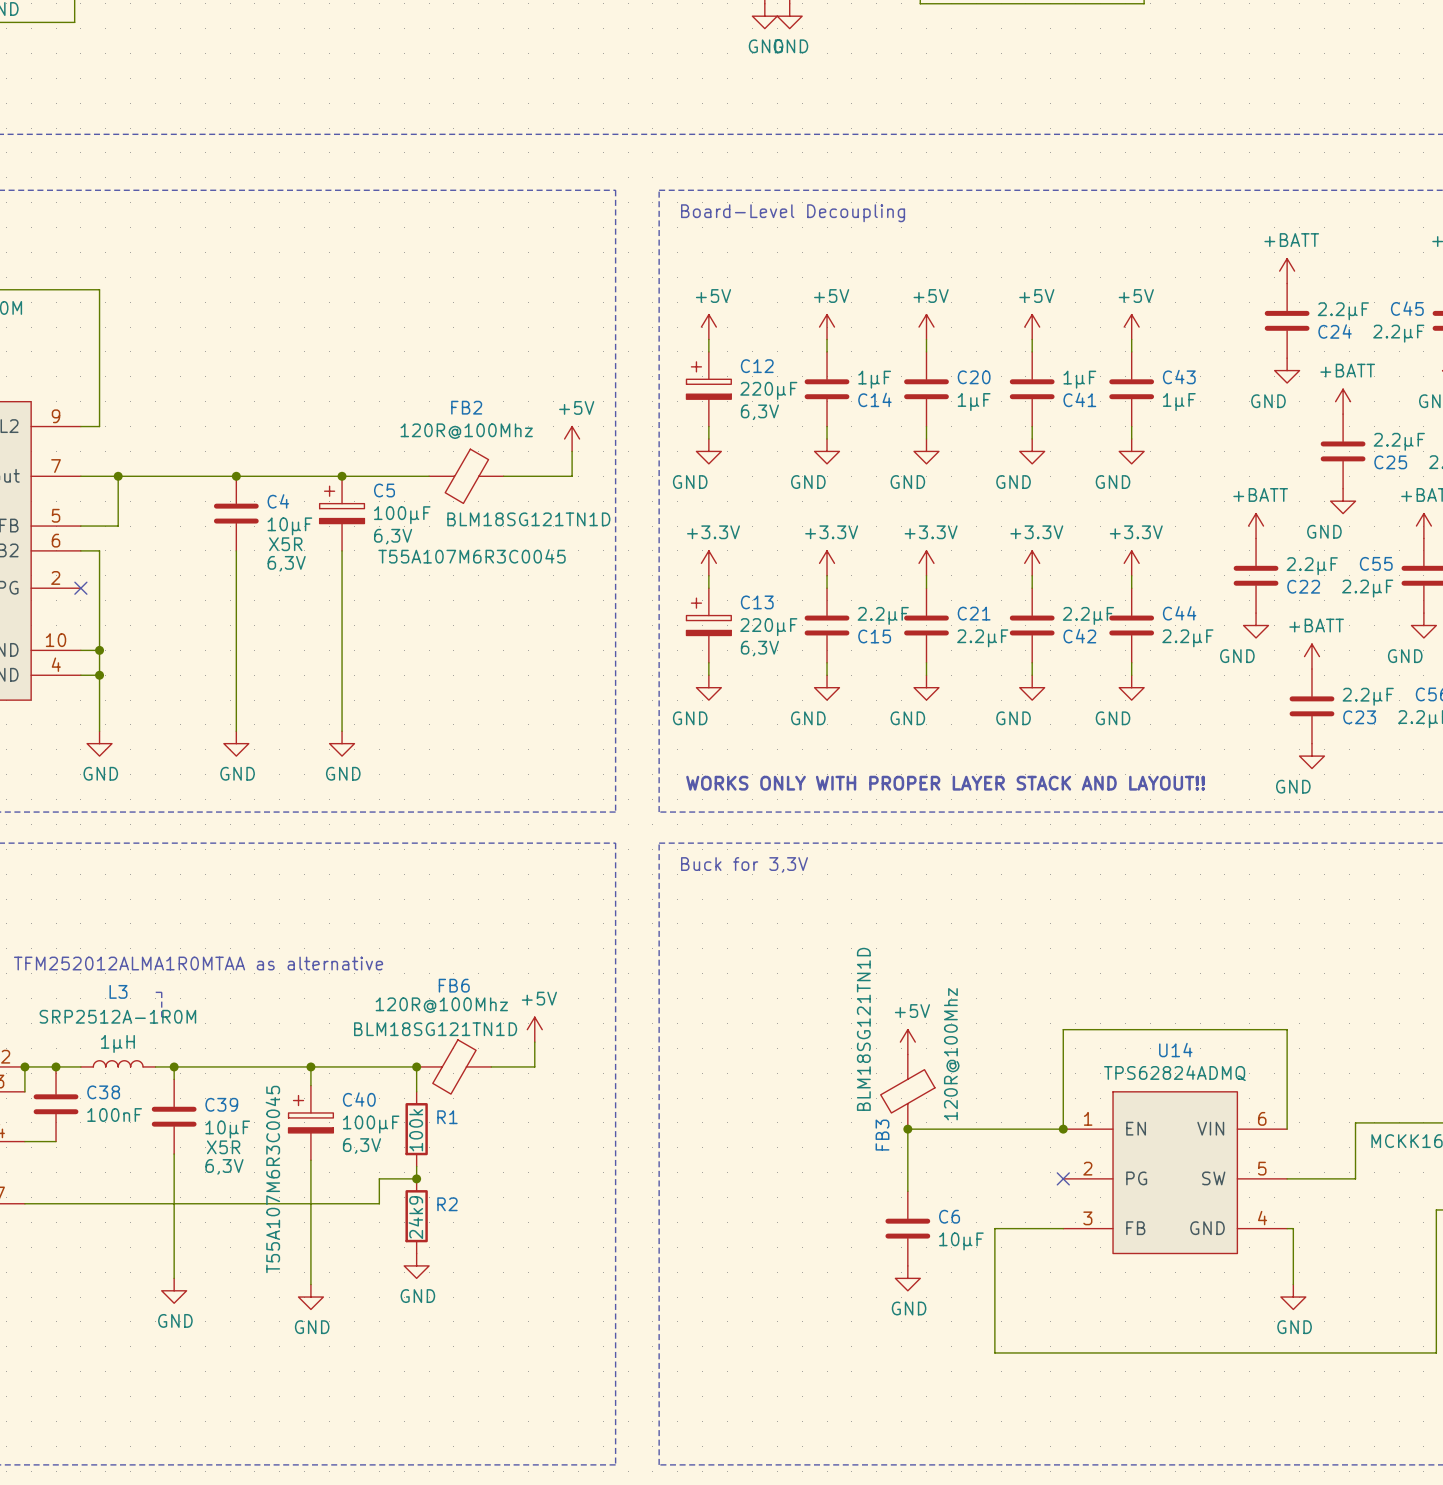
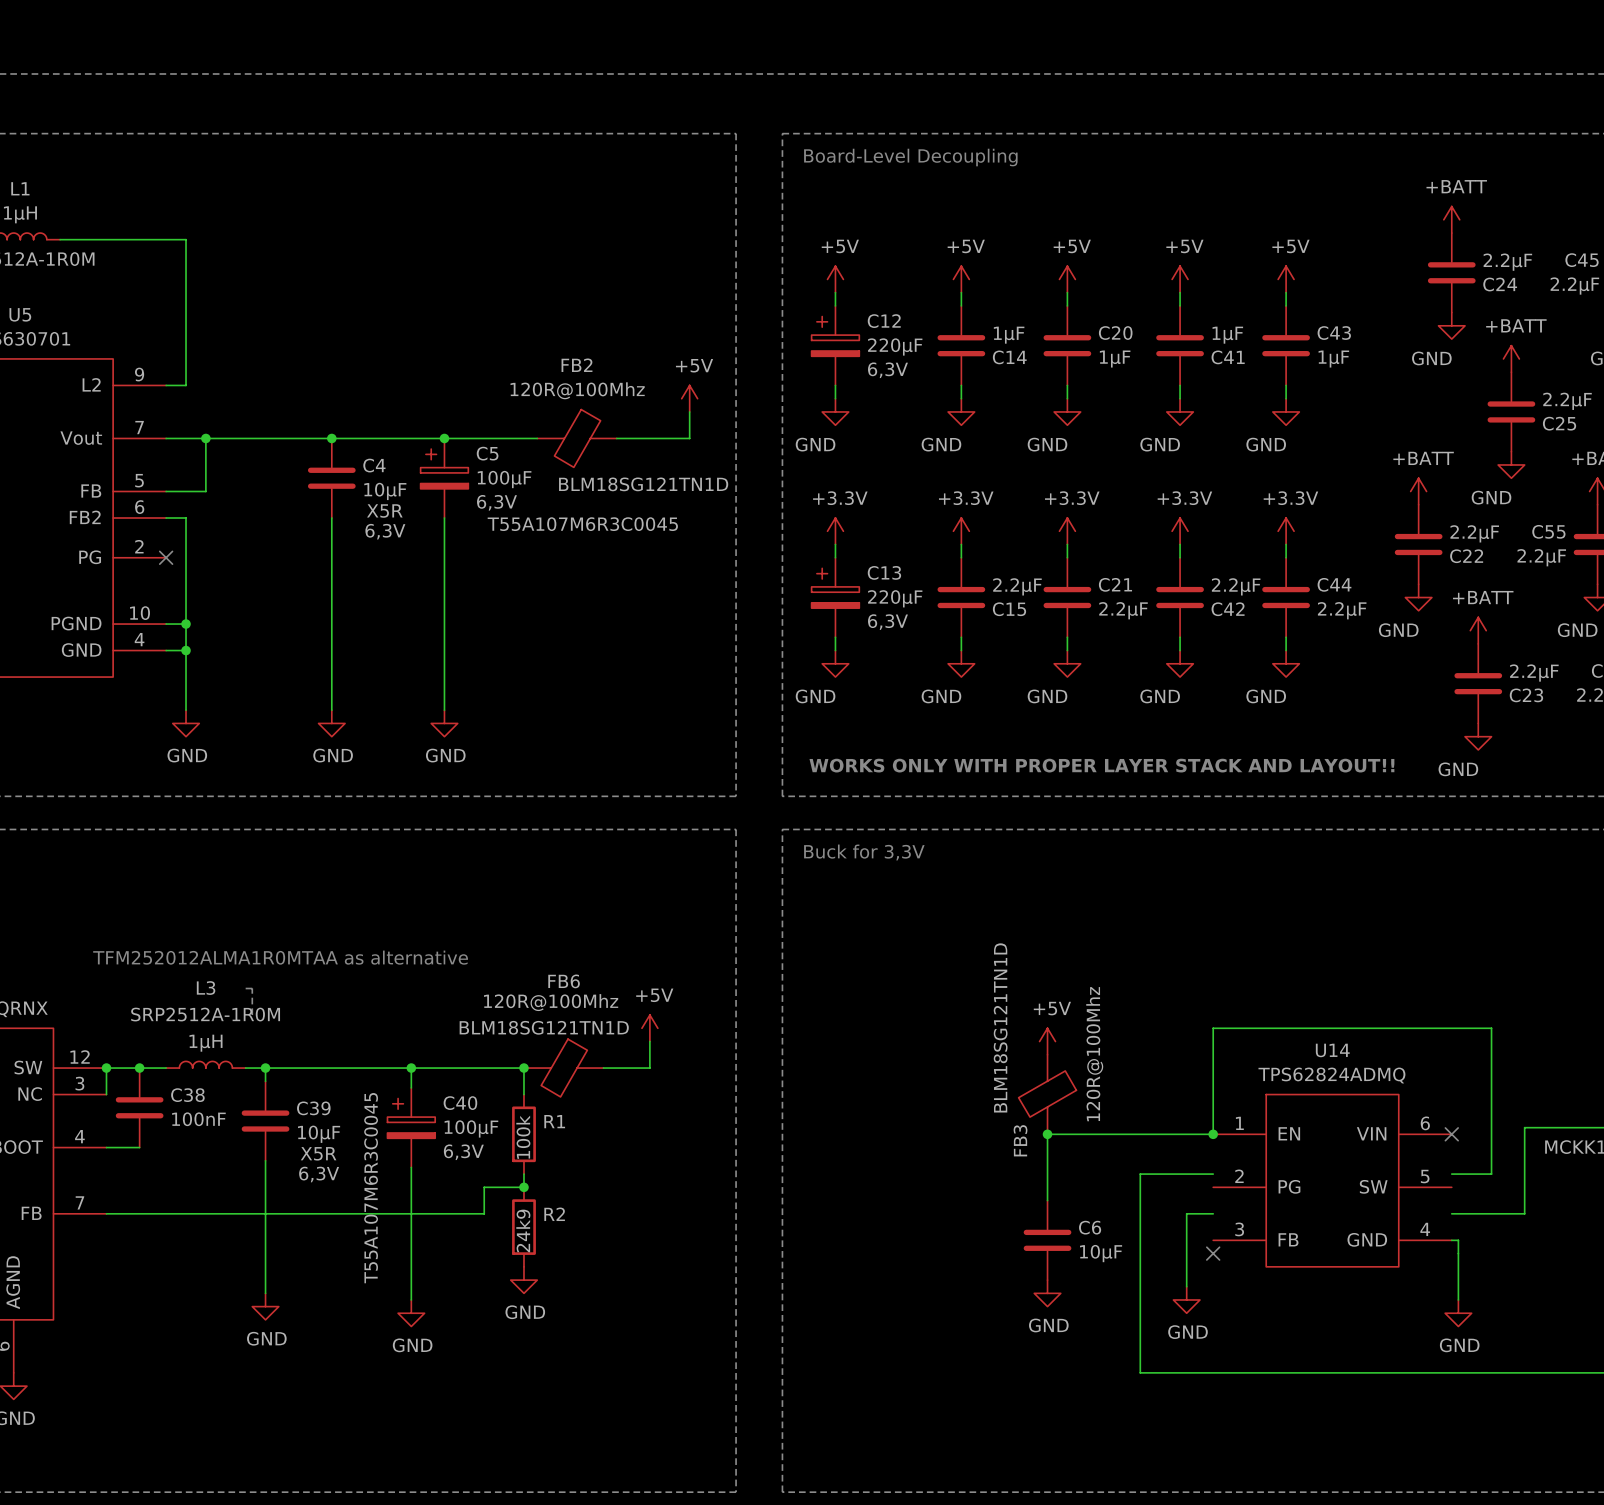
wire: (1287, 1029) (1287, 1129) -> (1451, 1028) (1491, 1028) (1491, 1174) (1451, 1174)
no-connect mark: none -> (1451, 1134)
no-connect mark: (1063, 1178) -> none
wire: (1287, 1178) (1355, 1178) -> (1451, 1213) (1524, 1213) (1524, 1187)
wire: none -> (1213, 1213) (1186, 1213) (1186, 1286)
wire: (994, 1228) (1063, 1228) -> (1140, 1240) (1140, 1174) (1213, 1174)
no-connect mark: none -> (1213, 1253)
power symbol: none -> GND (1186, 1299)

